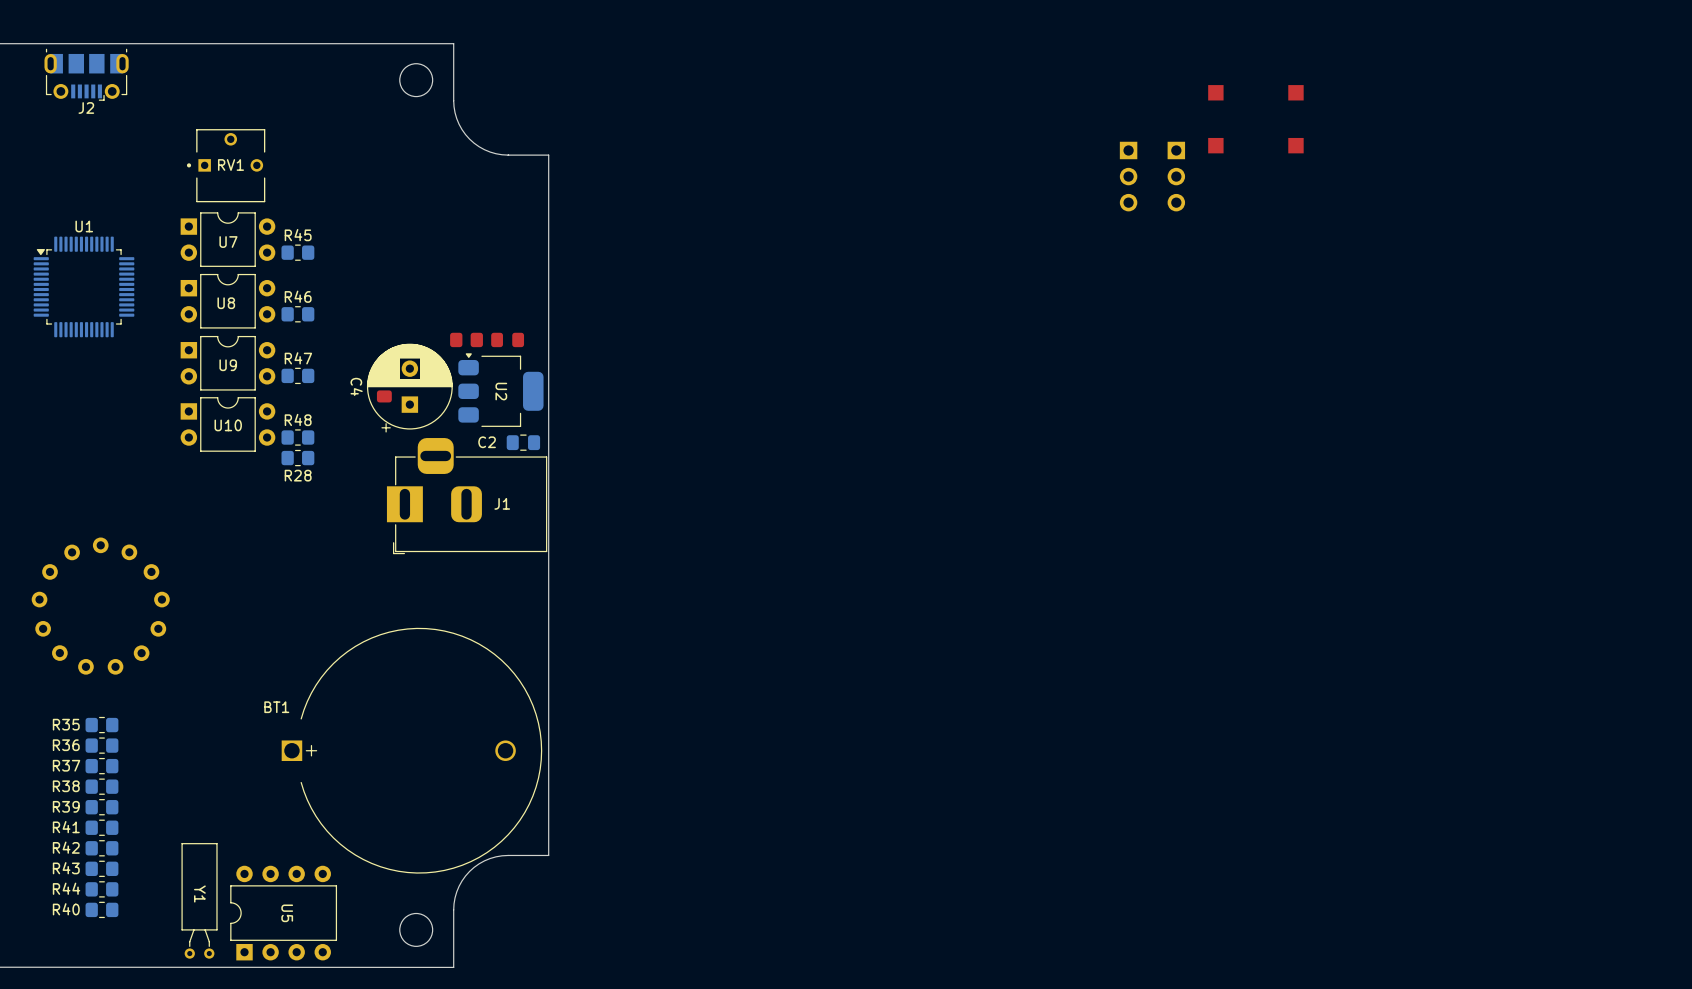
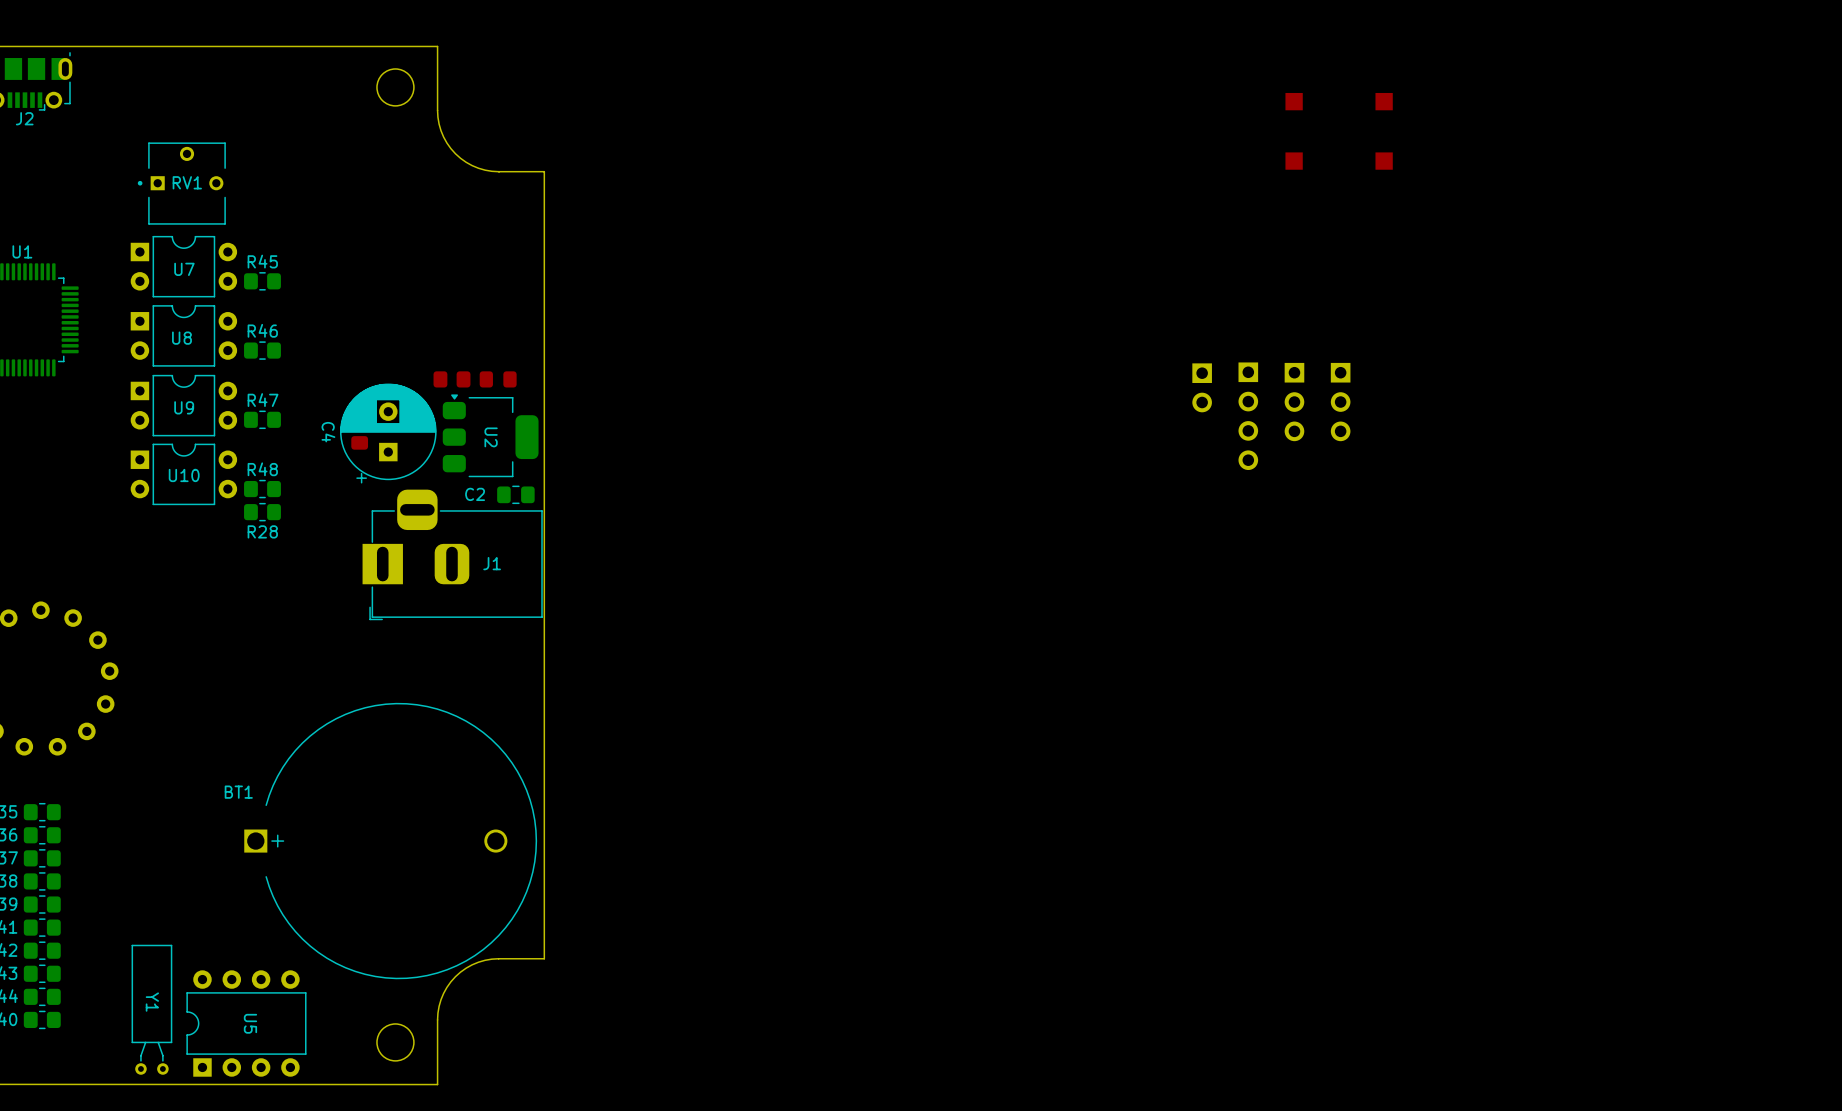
part: (1128, 176) -> none
part: (1176, 176) -> none
part: none -> (1202, 387)
part: none -> (1294, 402)
part: none -> (1340, 402)
part: none -> (1248, 416)

